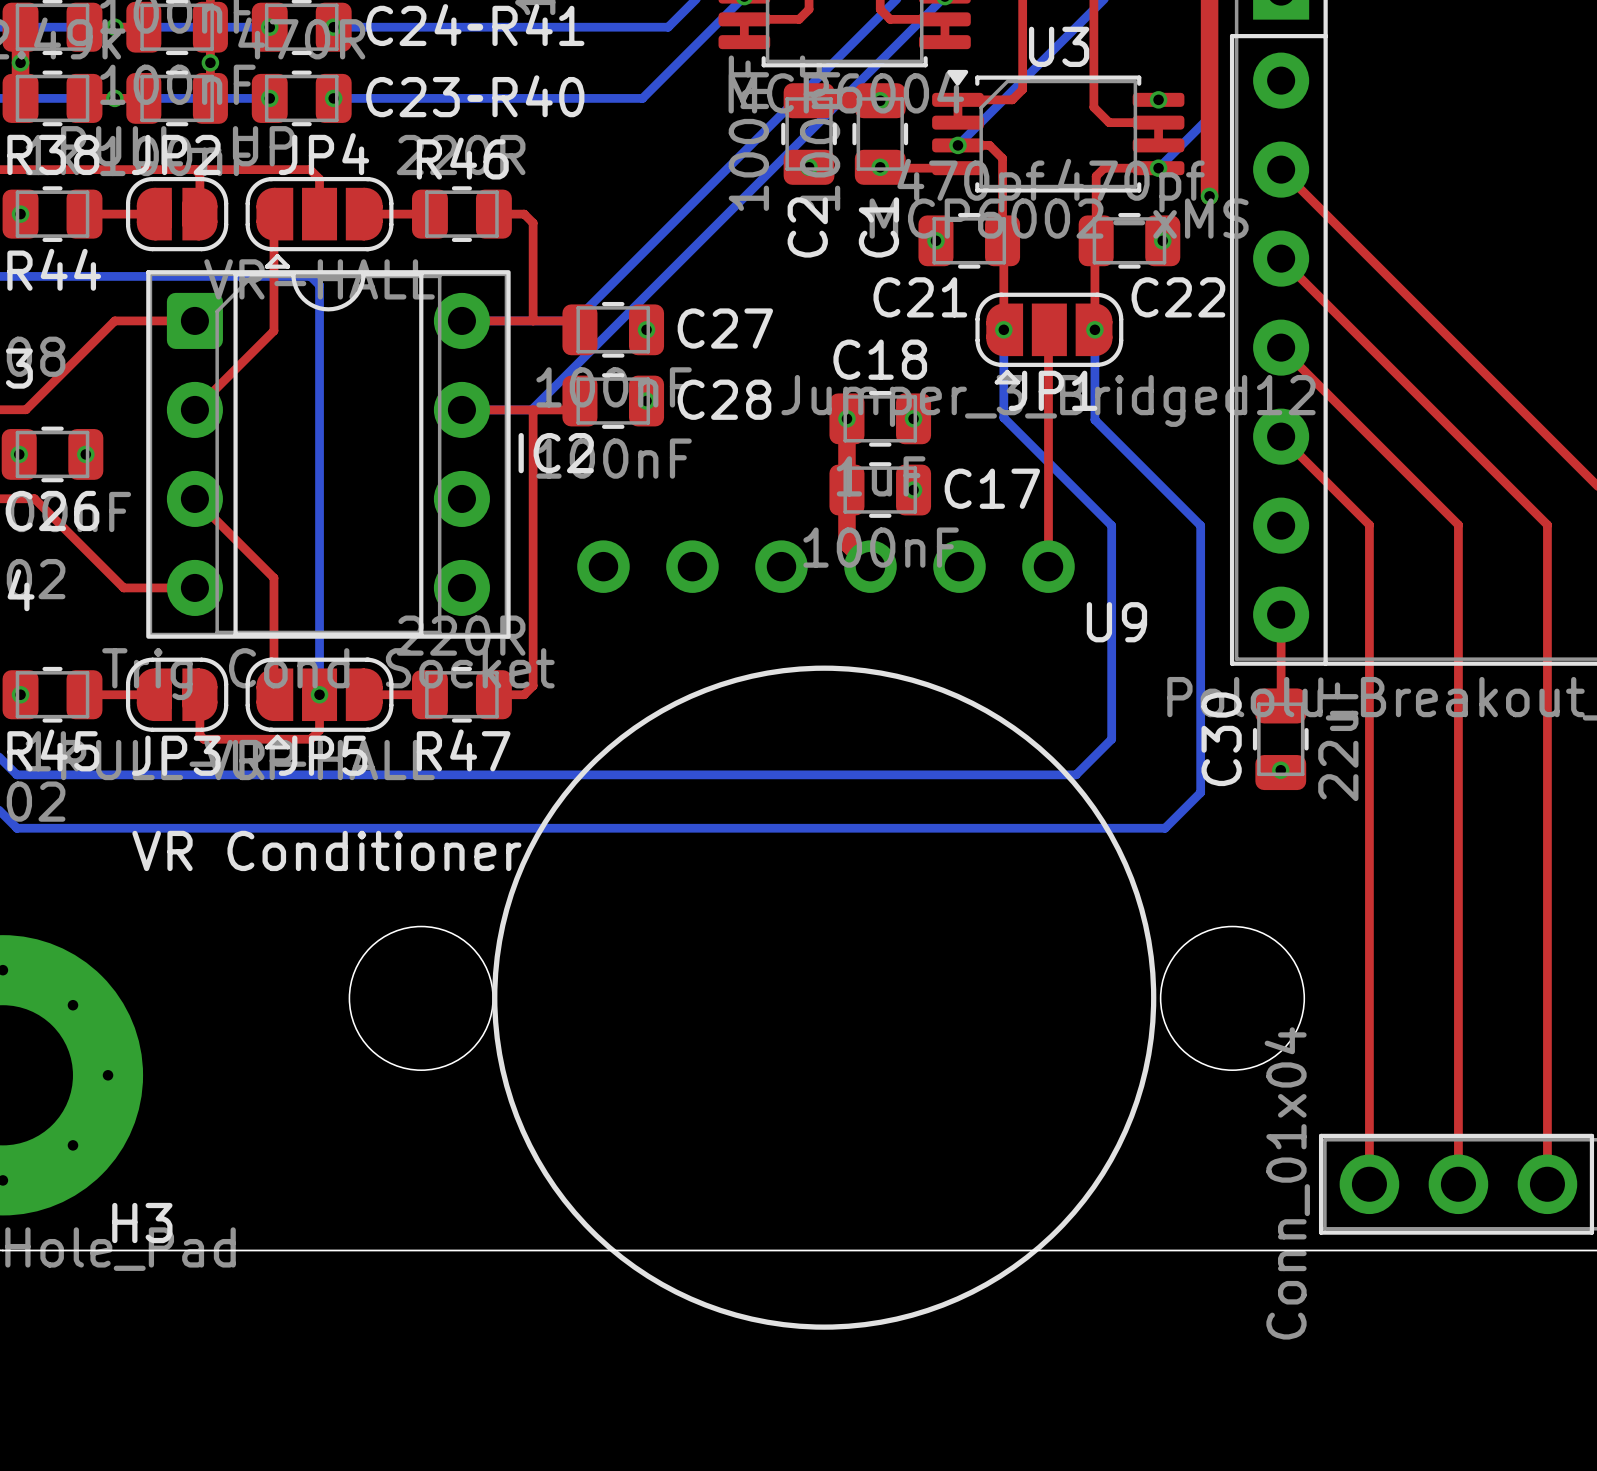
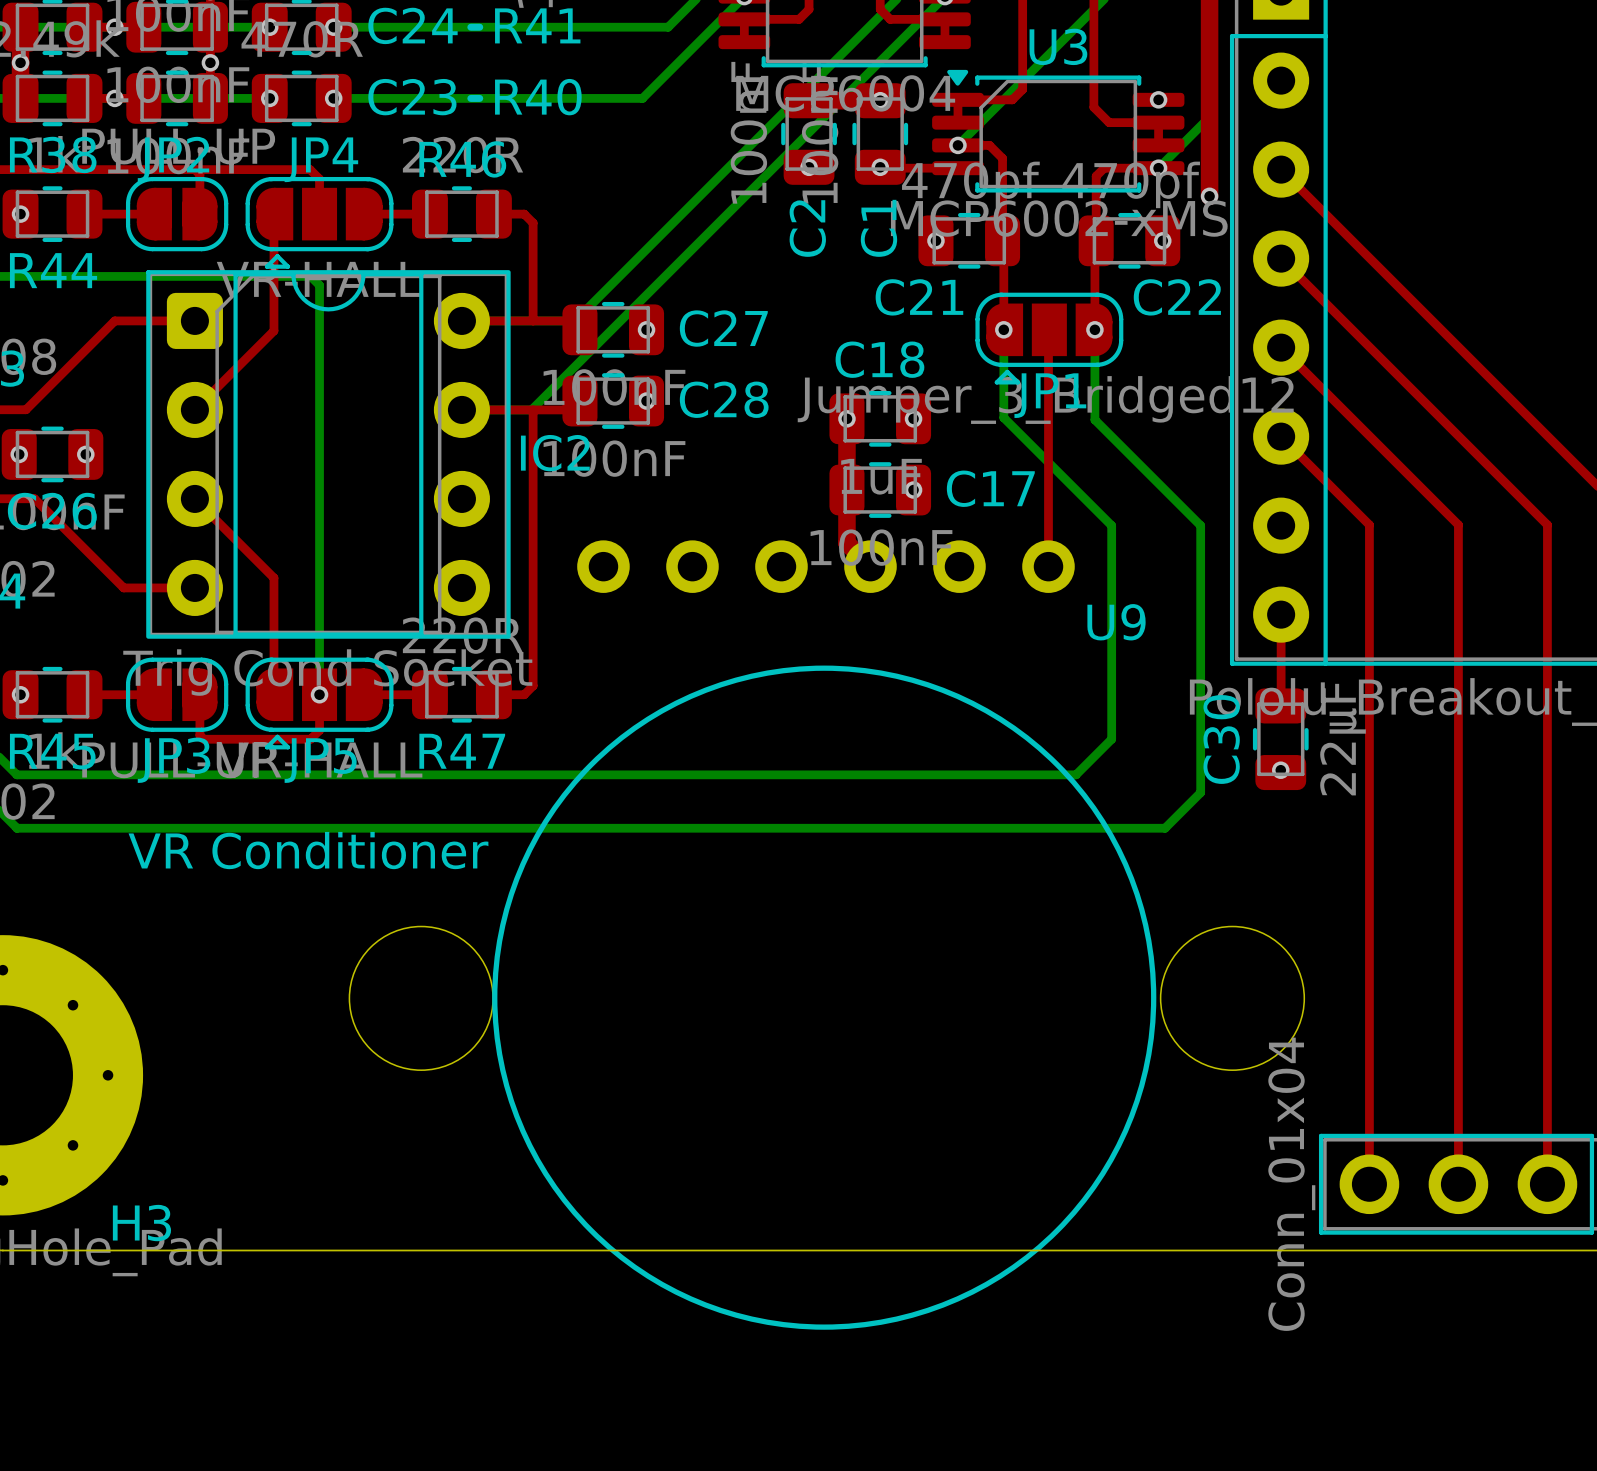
C30 value: 22uF (1338, 739) -> 22µF (1343, 738)

